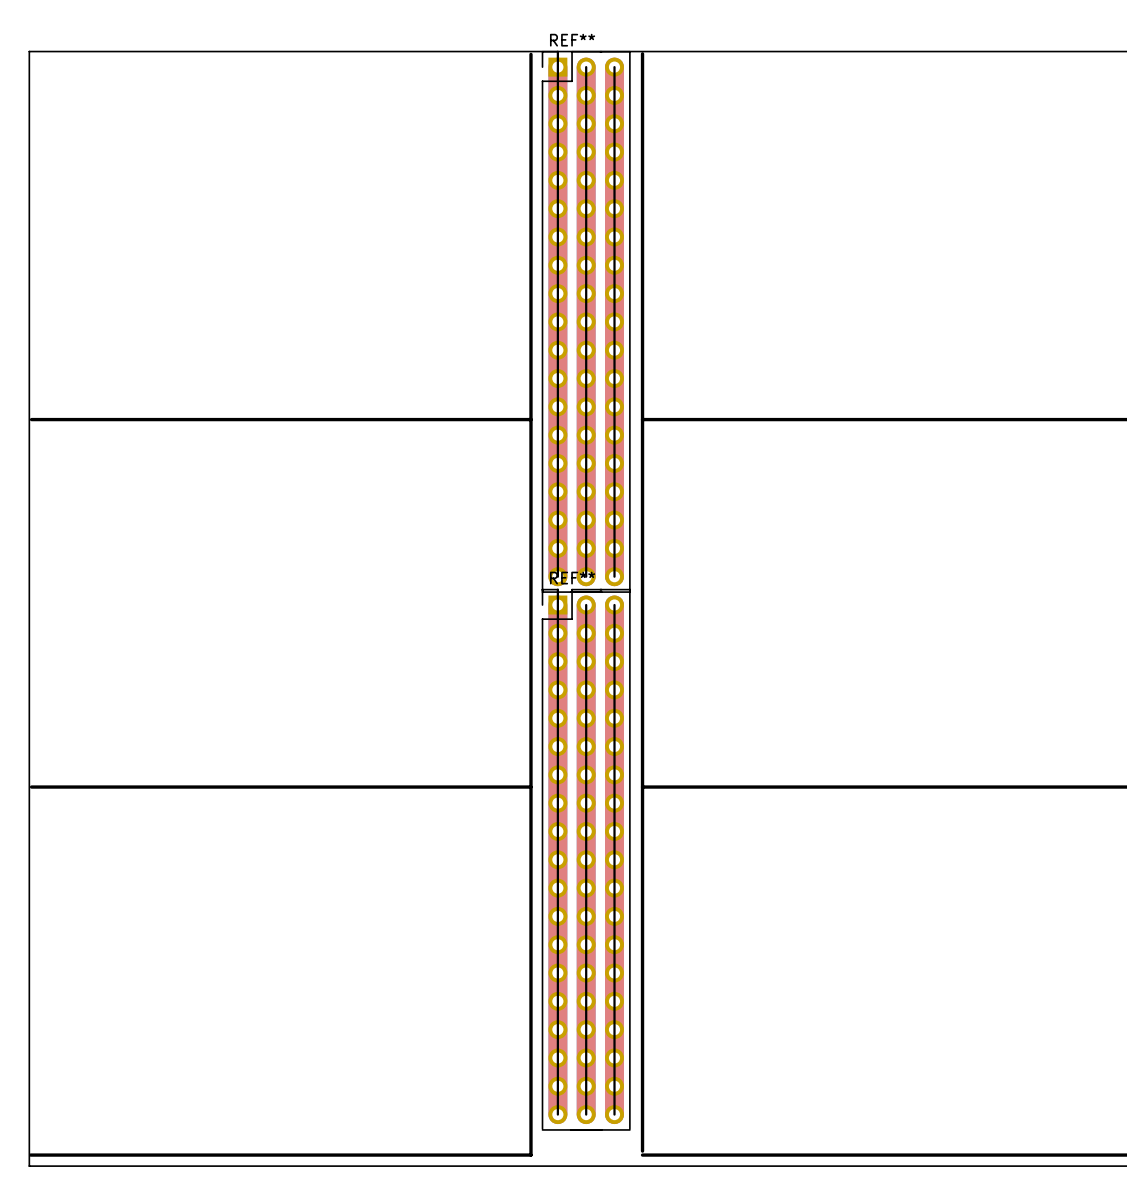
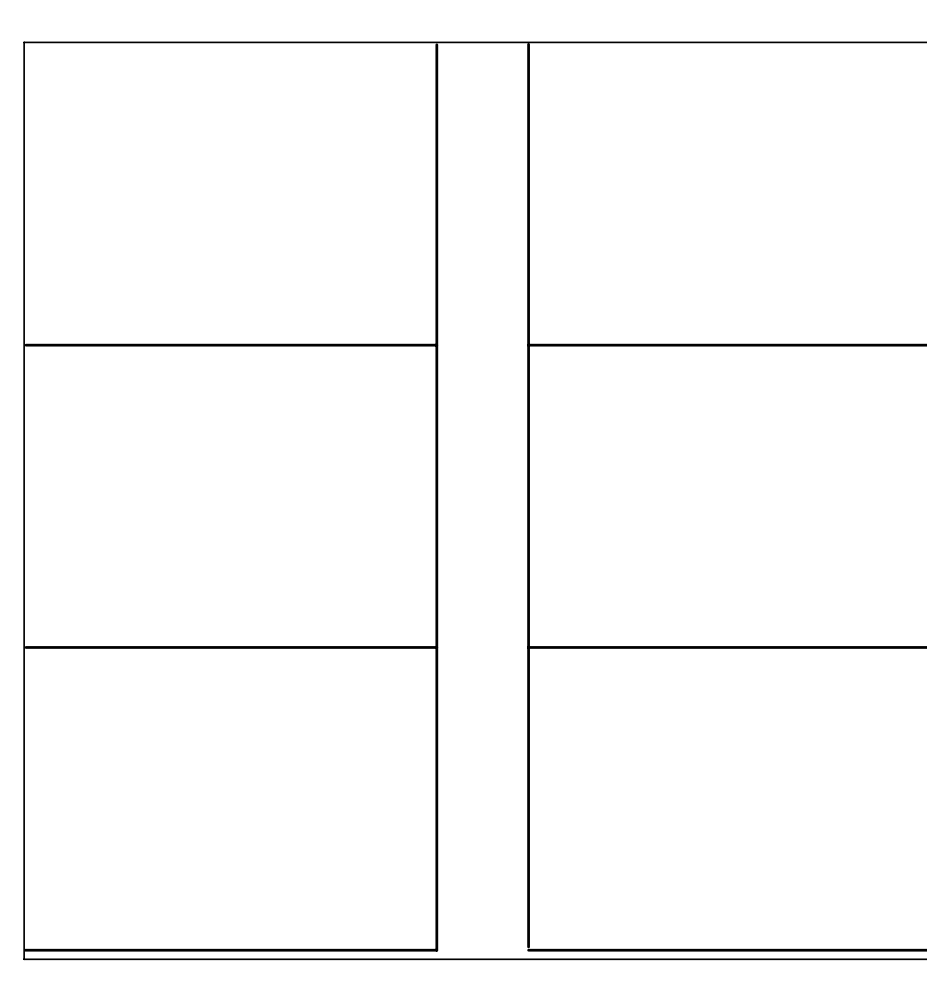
REF**: (586, 321) -> none
REF**: (586, 859) -> none

